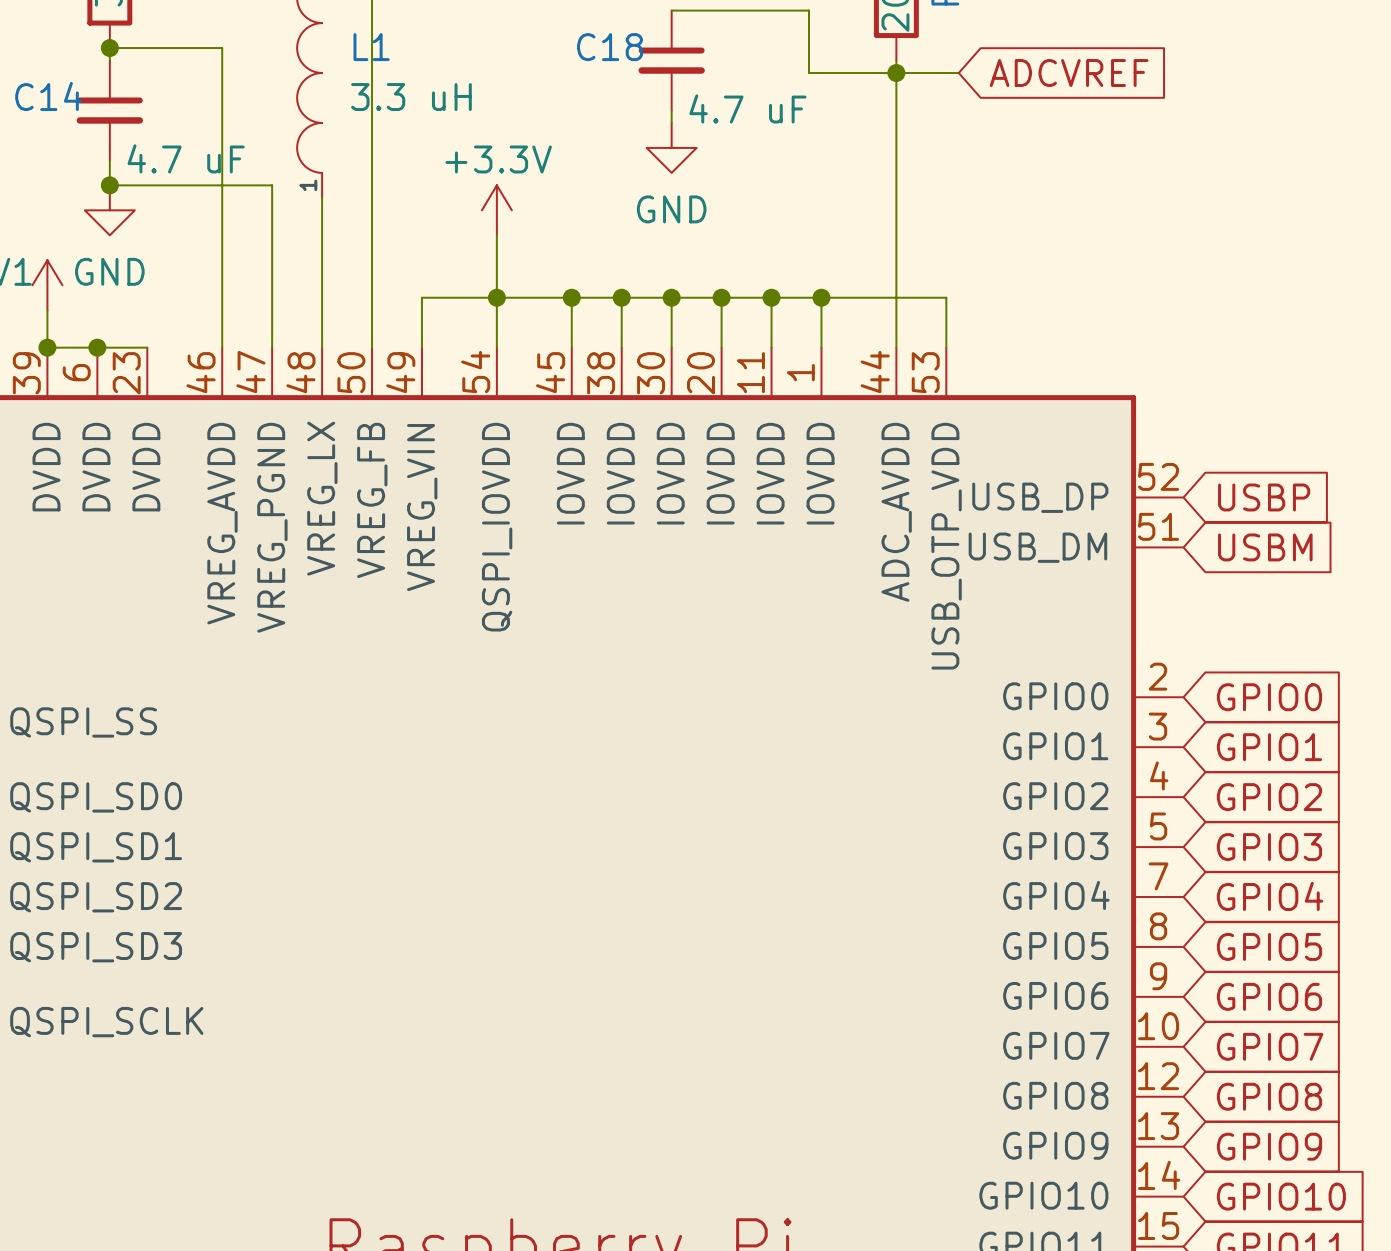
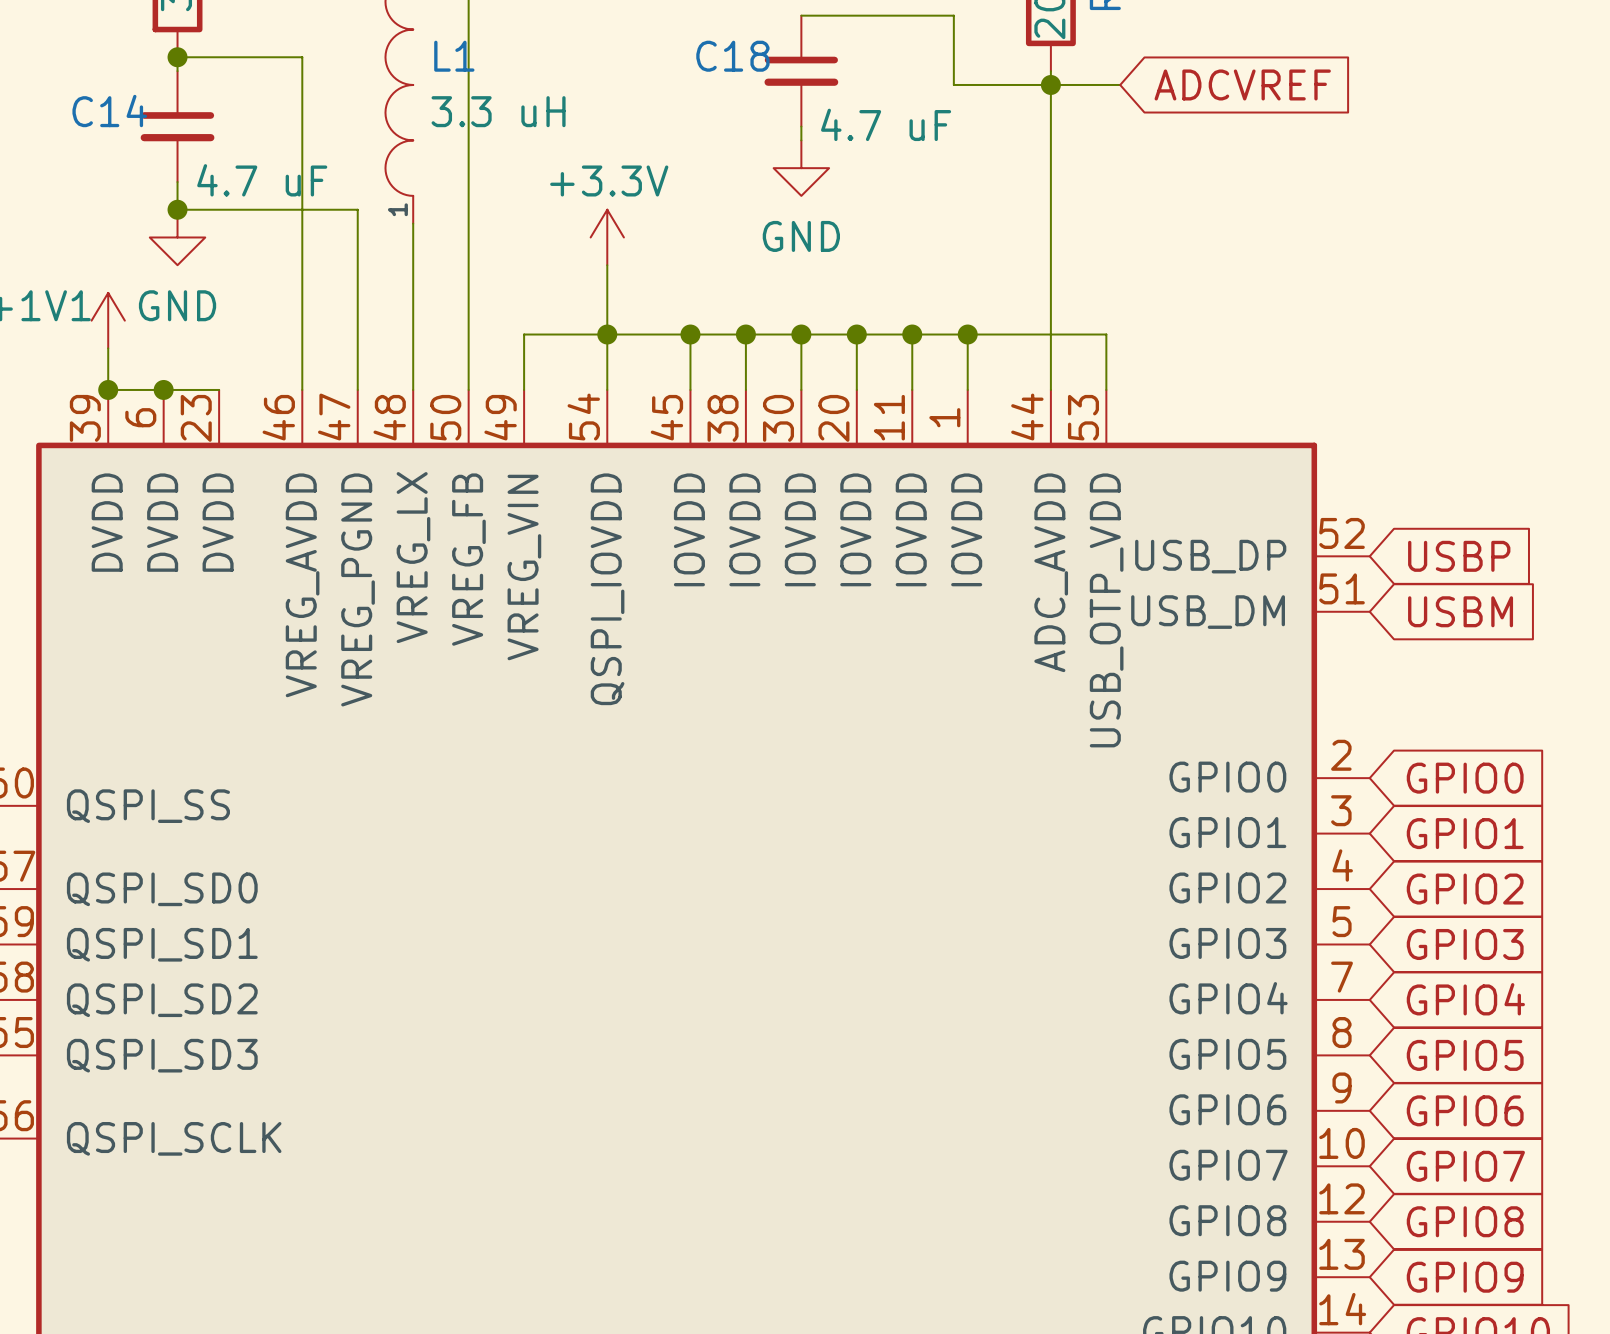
L1 name position: L1 (371, 47) -> L1 (454, 56)
L1 value position: 3.3 uH (411, 97) -> 3.3 uH (498, 111)

